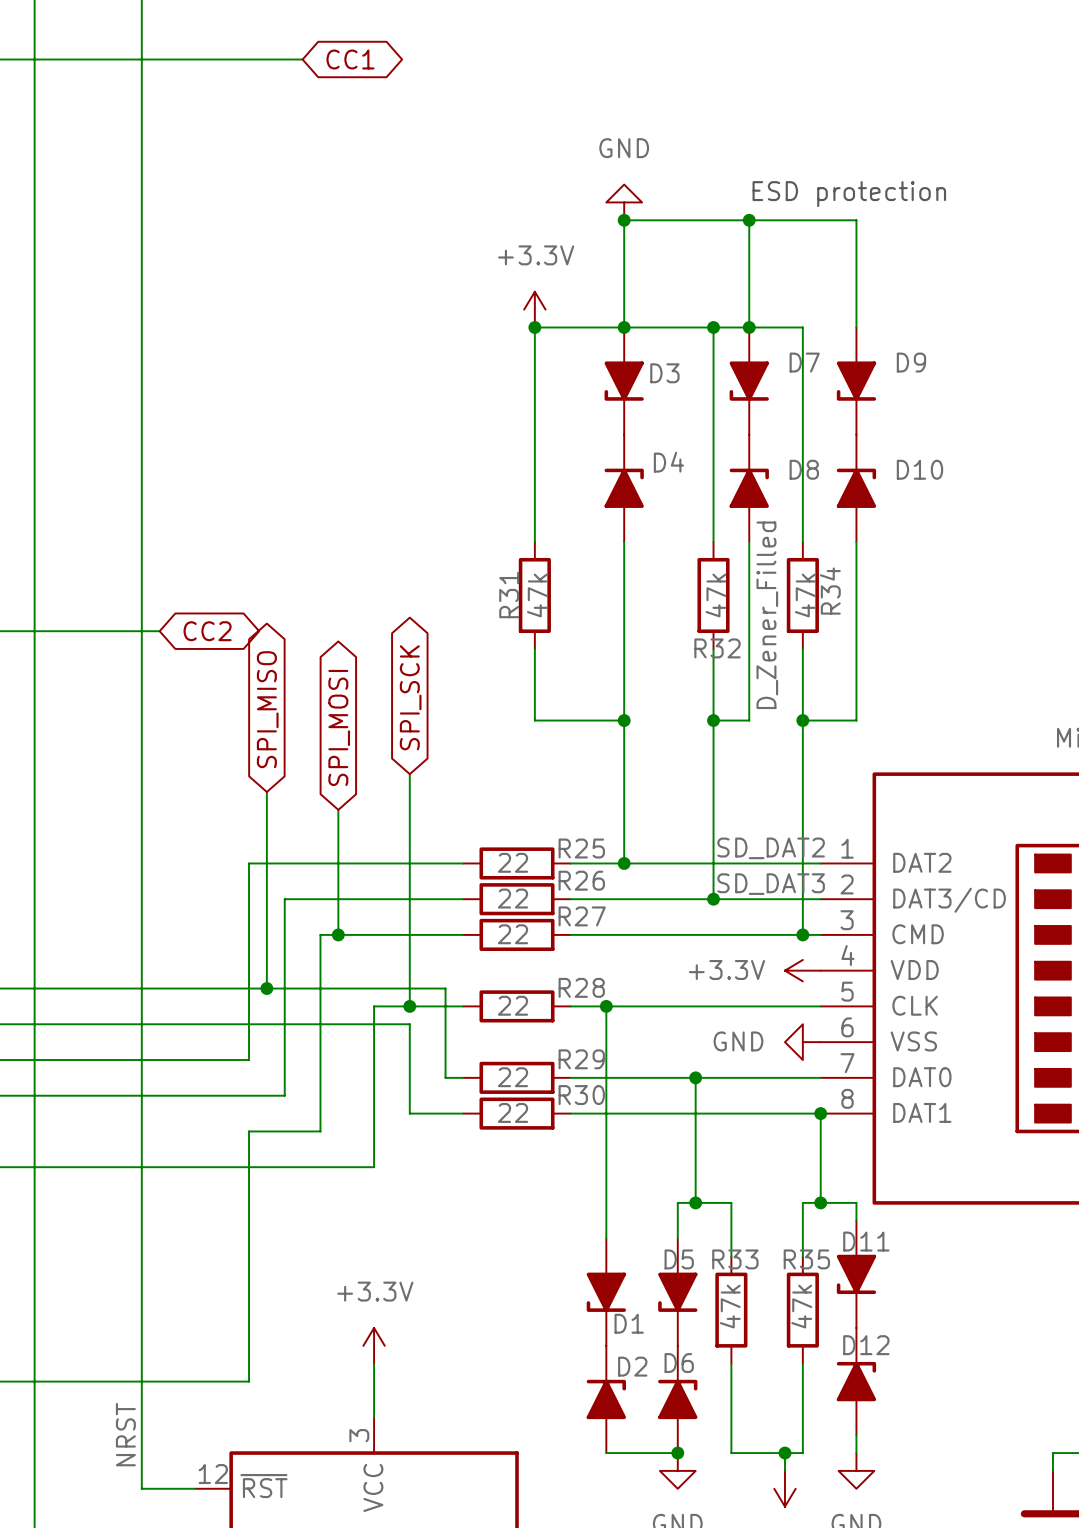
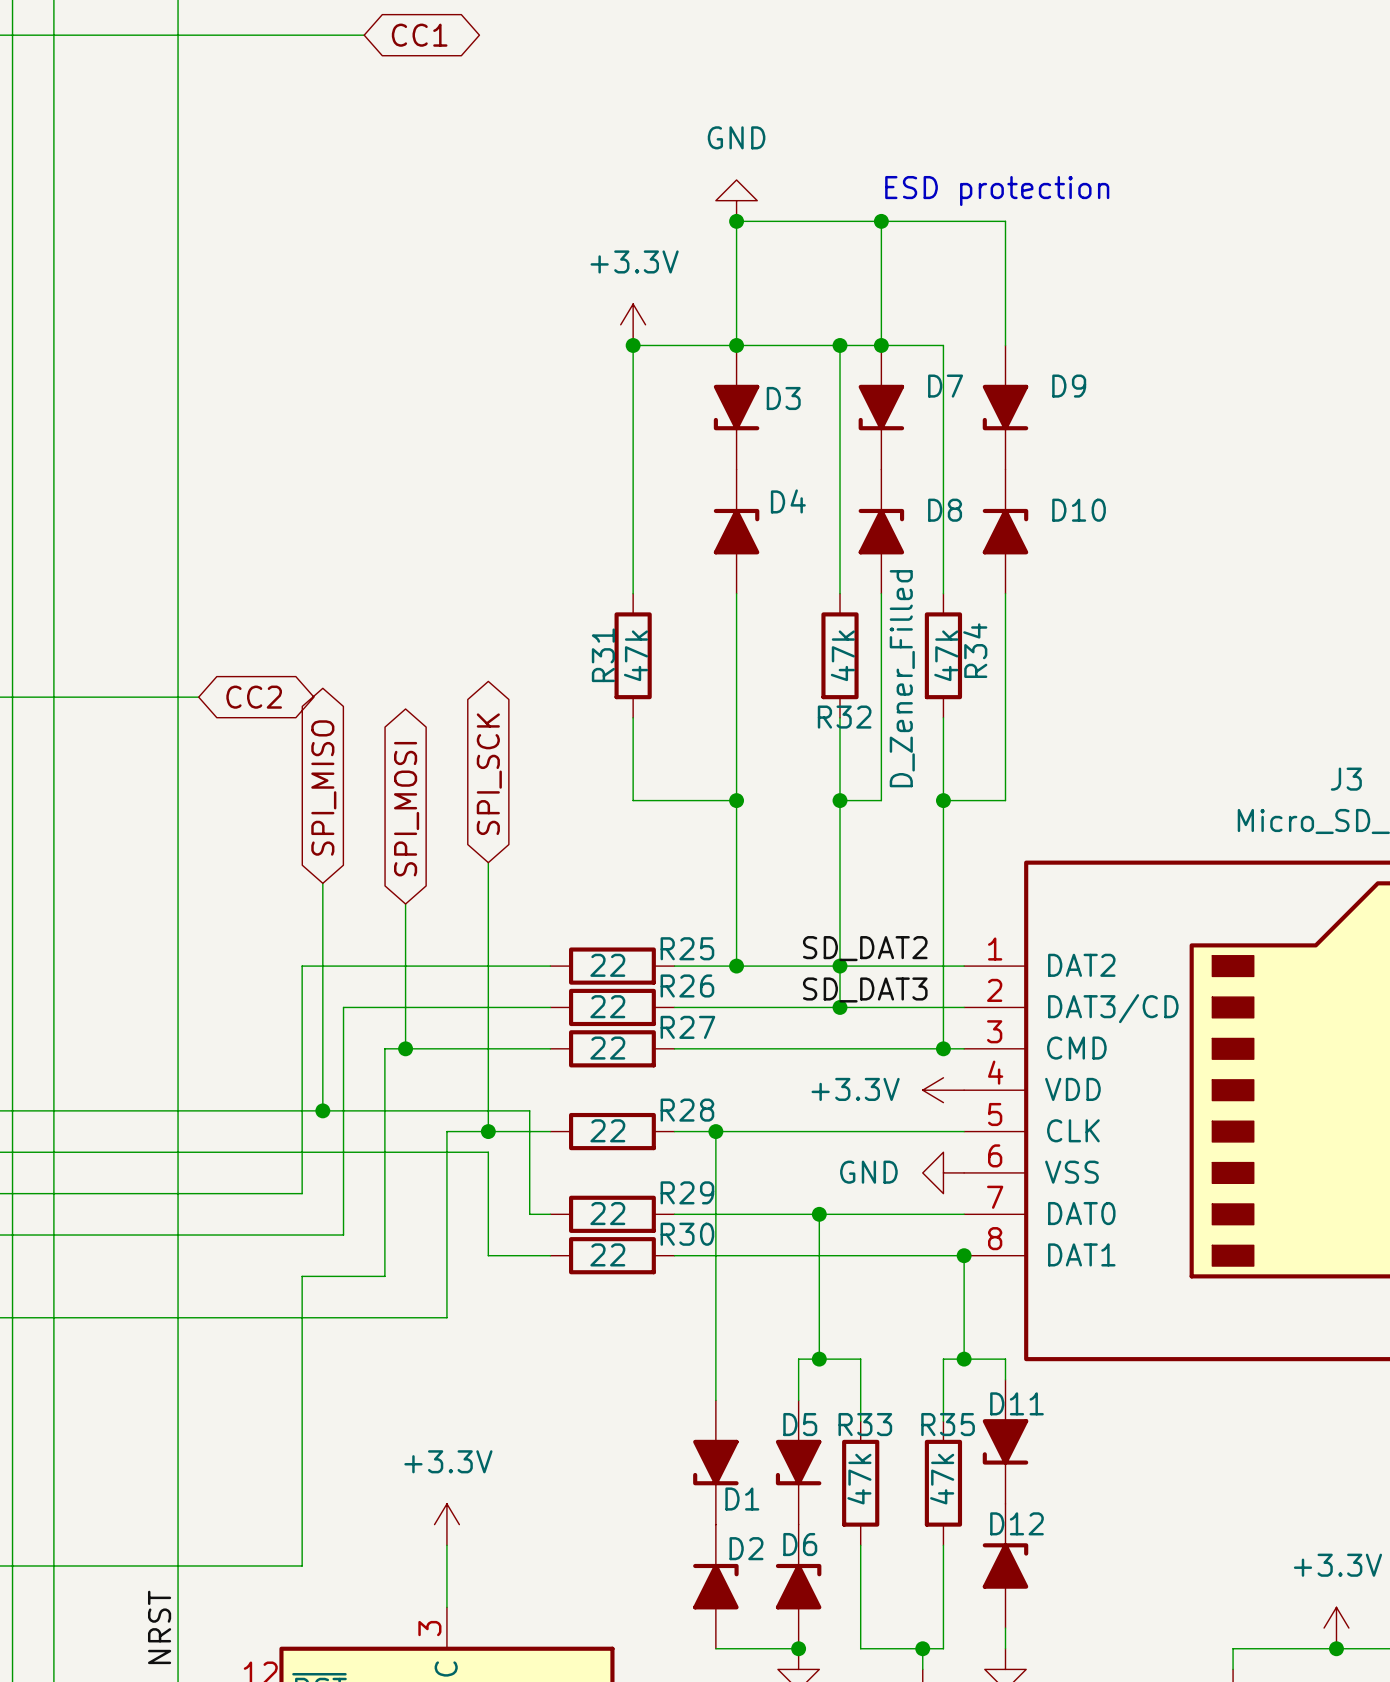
label position: SD_DAT2 (771, 848) -> SD_DAT2 (865, 948)
junction: none -> (840, 966)
label position: SD_DAT3 (771, 884) -> SD_DAT3 (865, 989)

